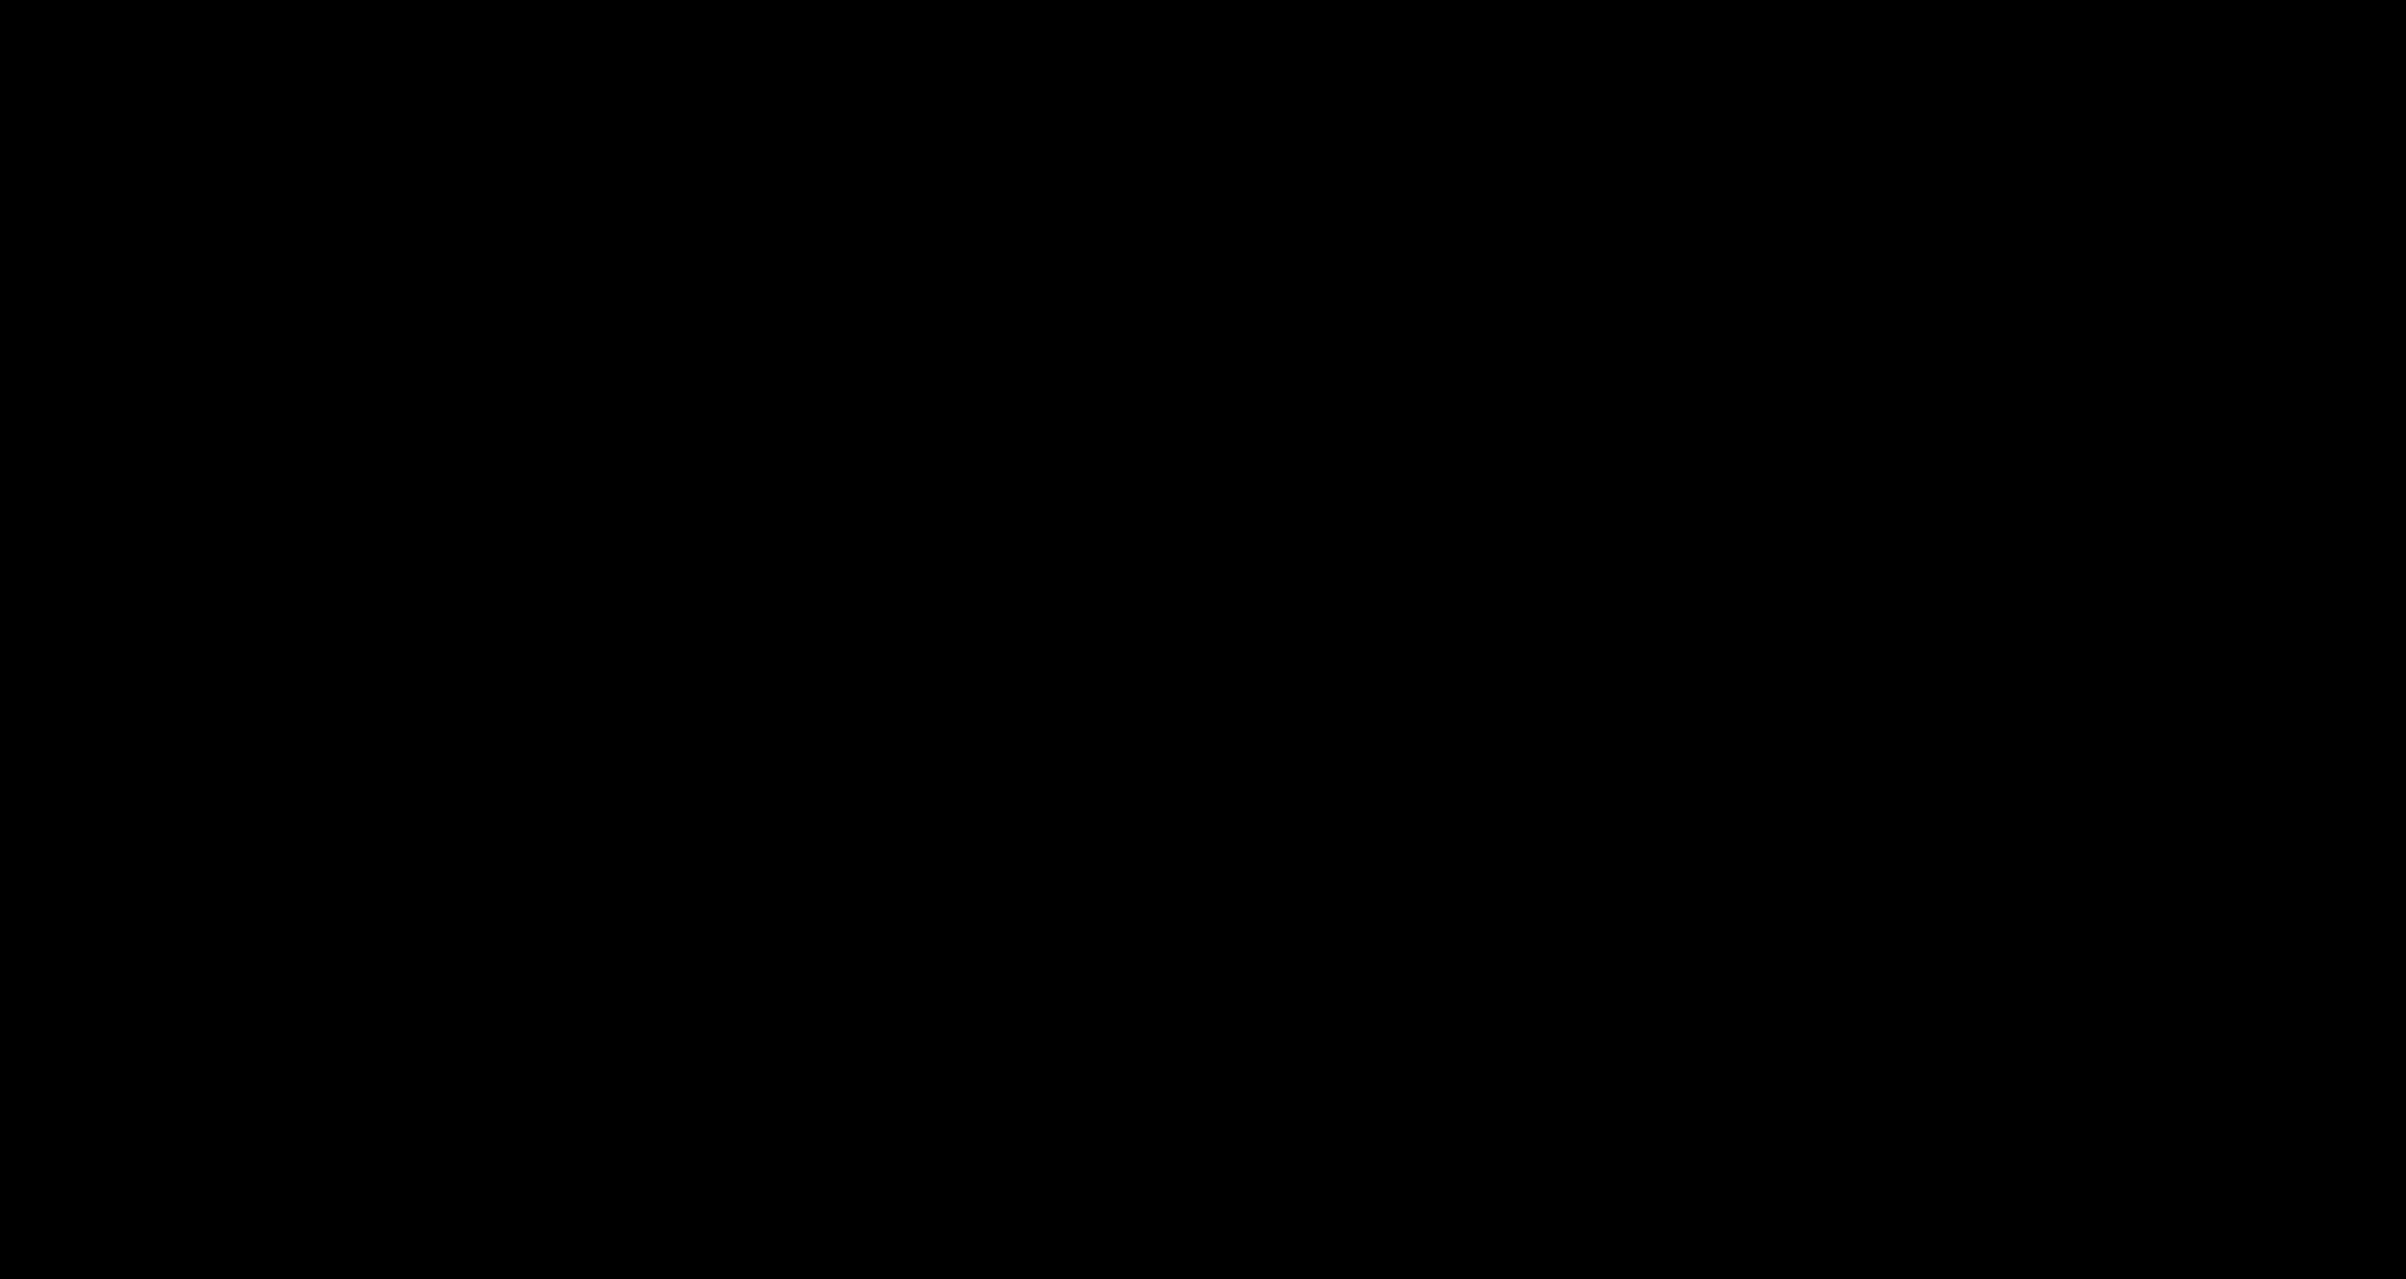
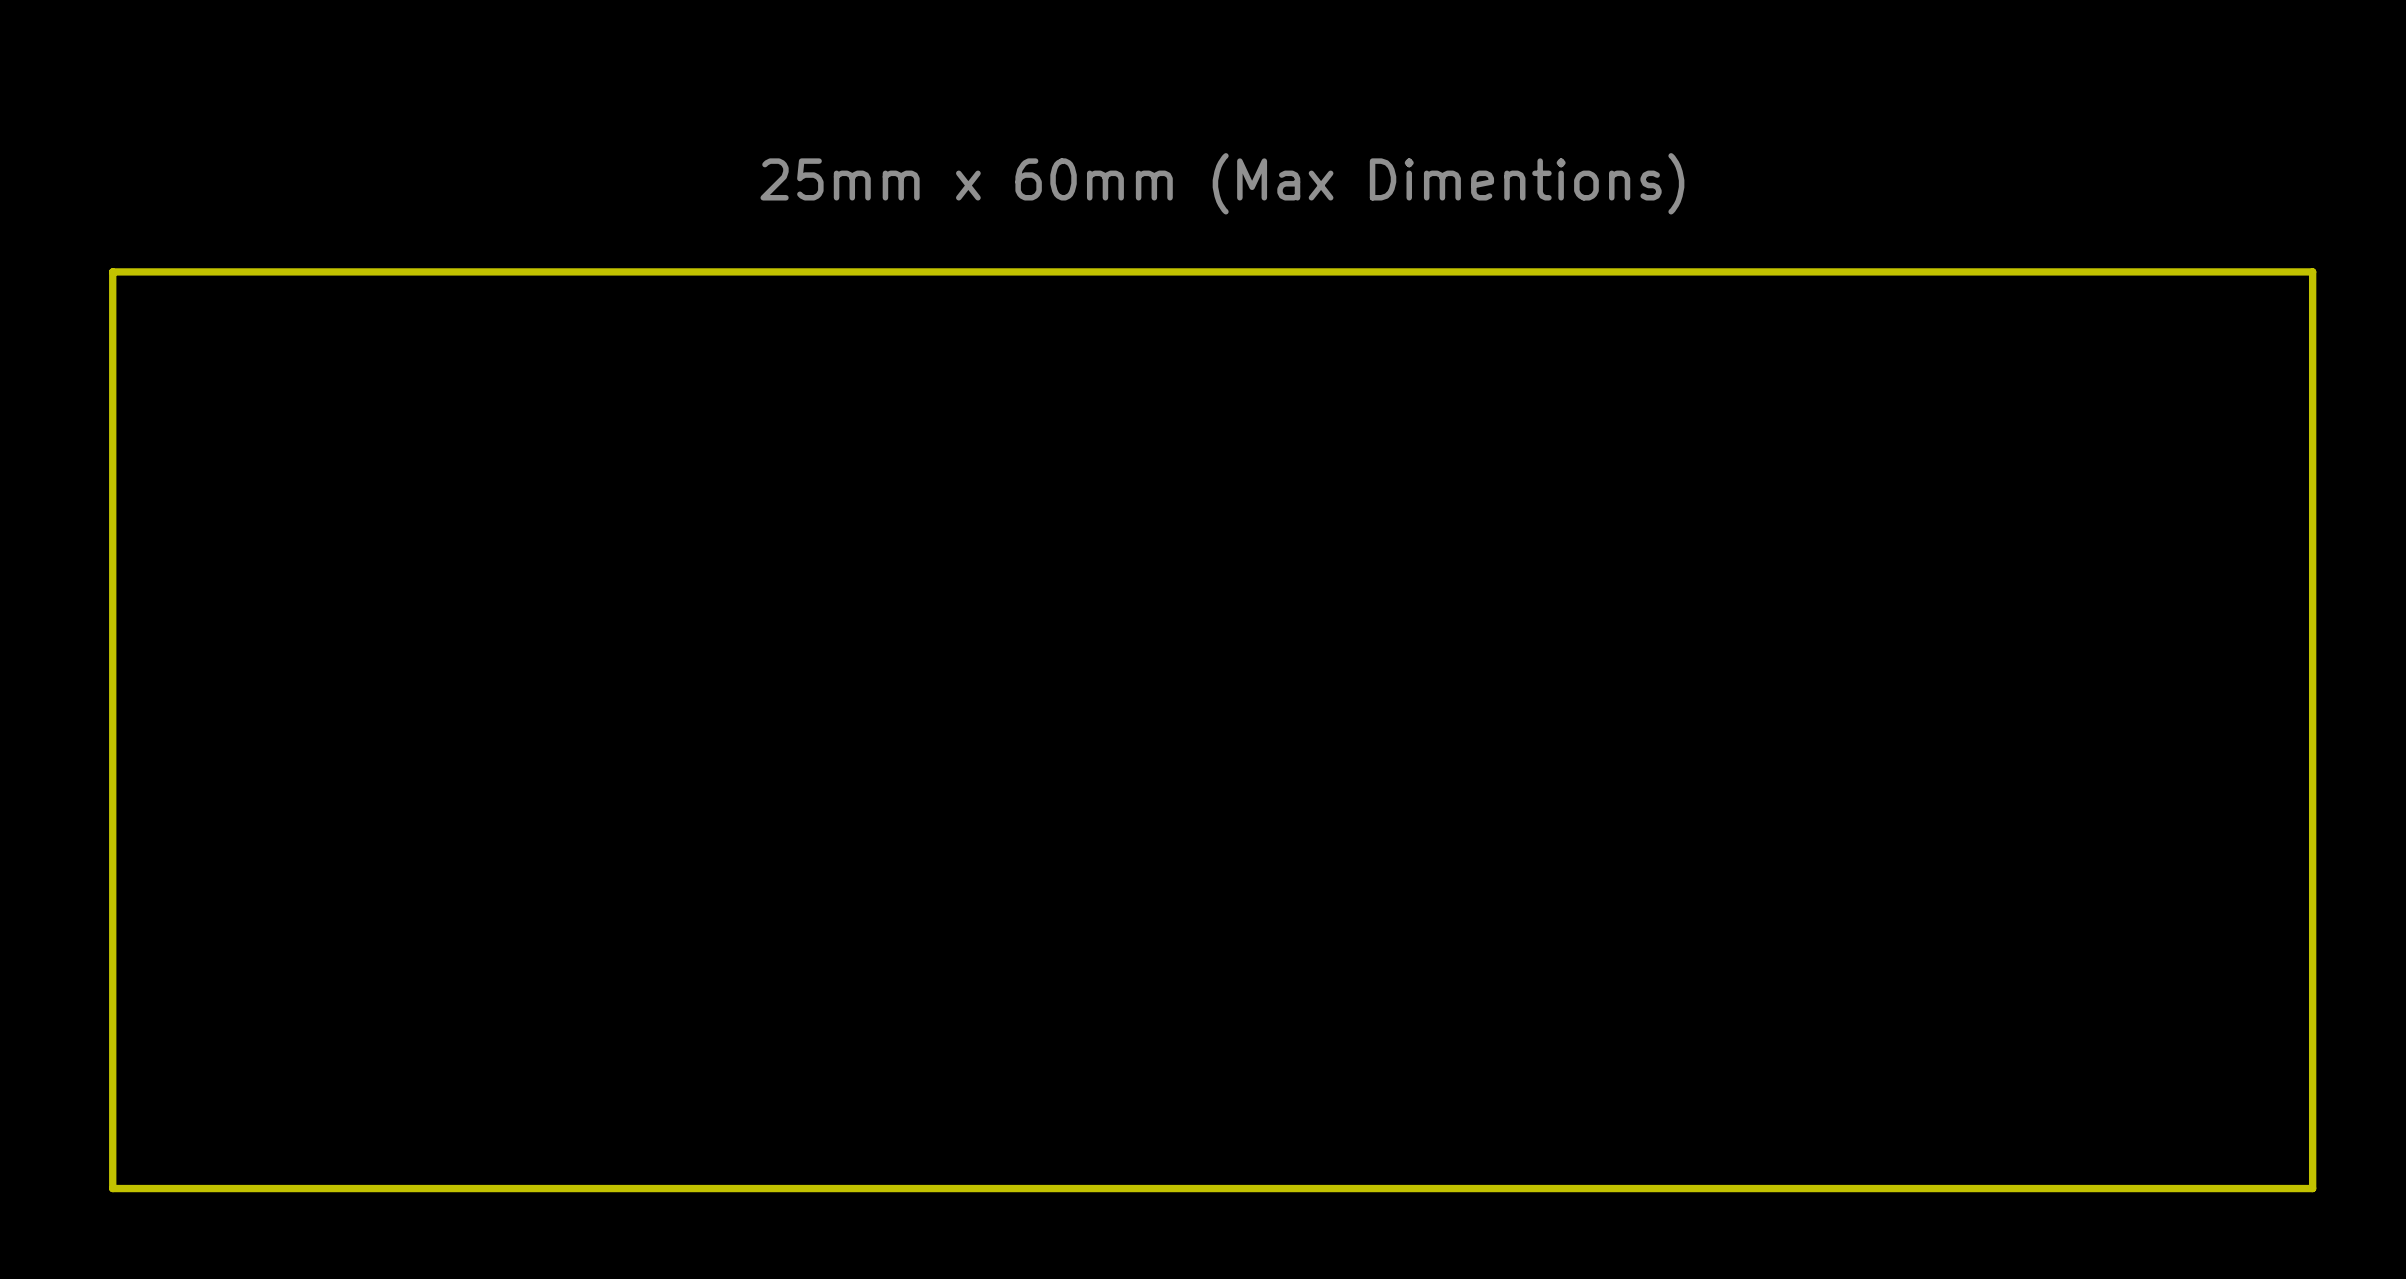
text: none -> 25mm x 60mm (Max Dimentions) (1222, 183)
board edge: none -> (112, 271) (2312, 271) (2312, 1188) (112, 1188) (112, 271)

